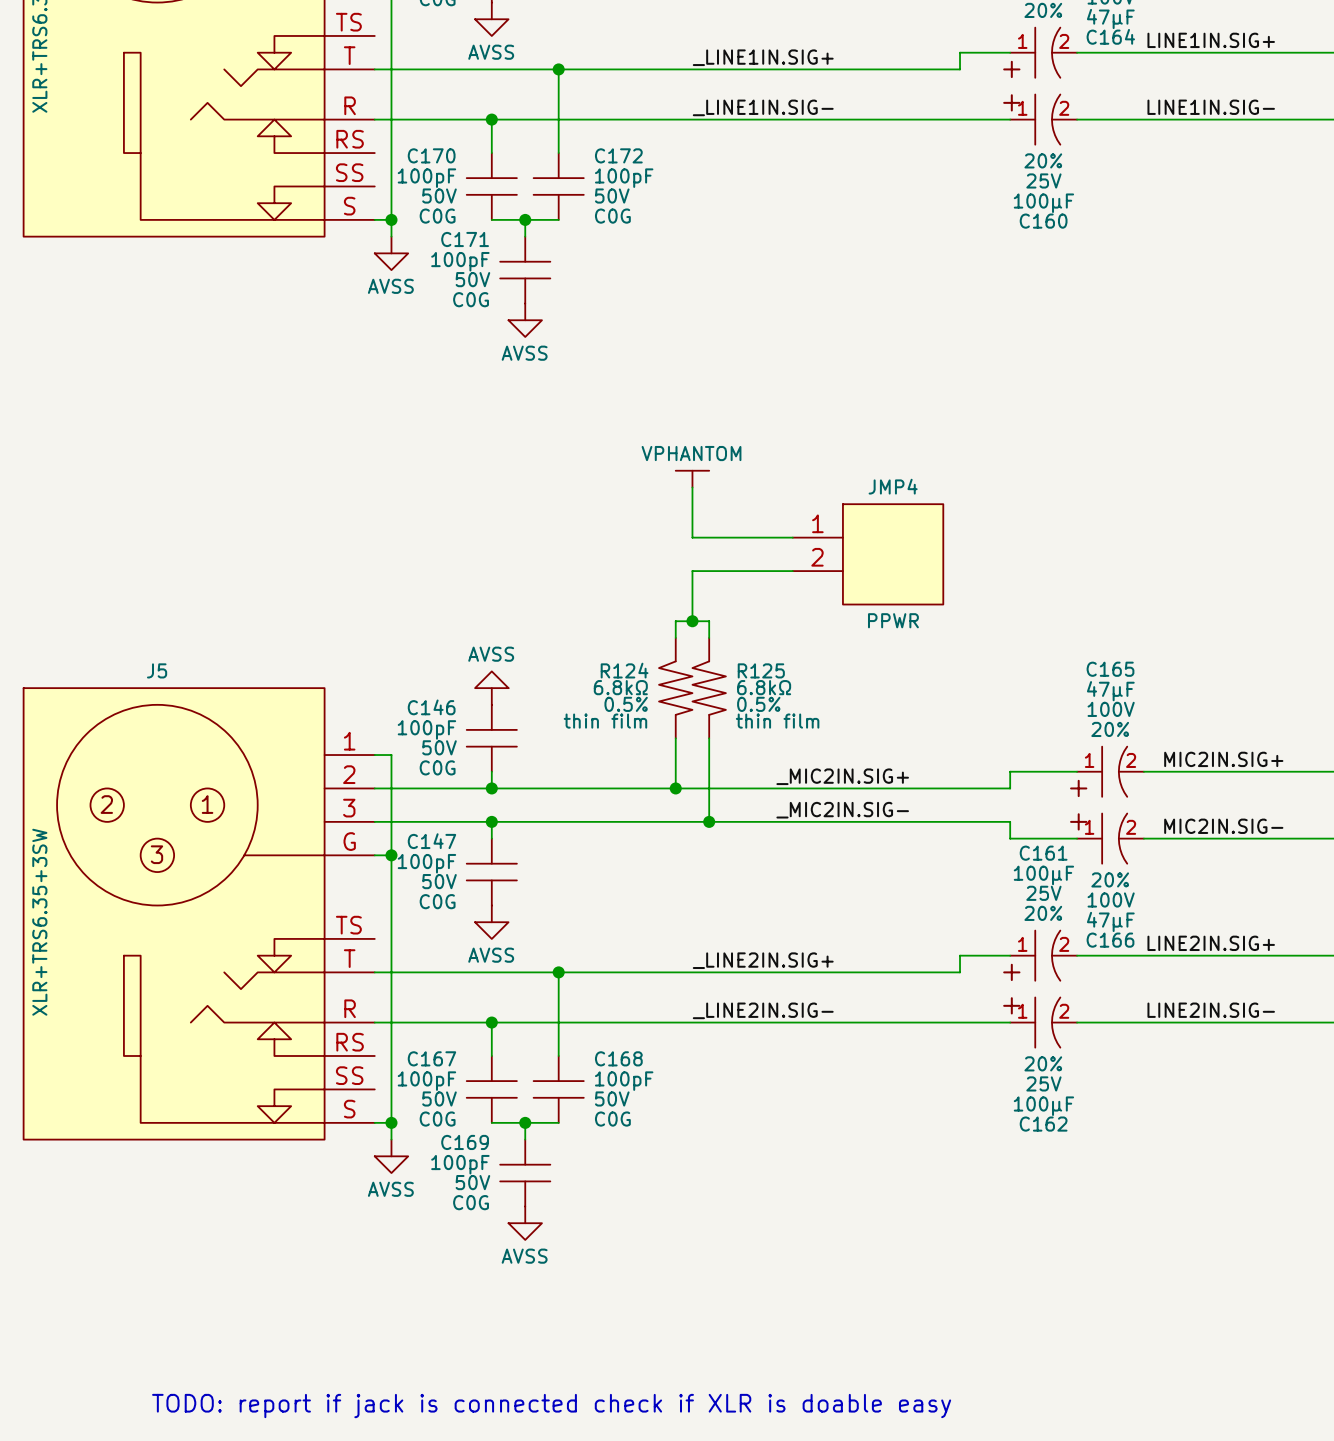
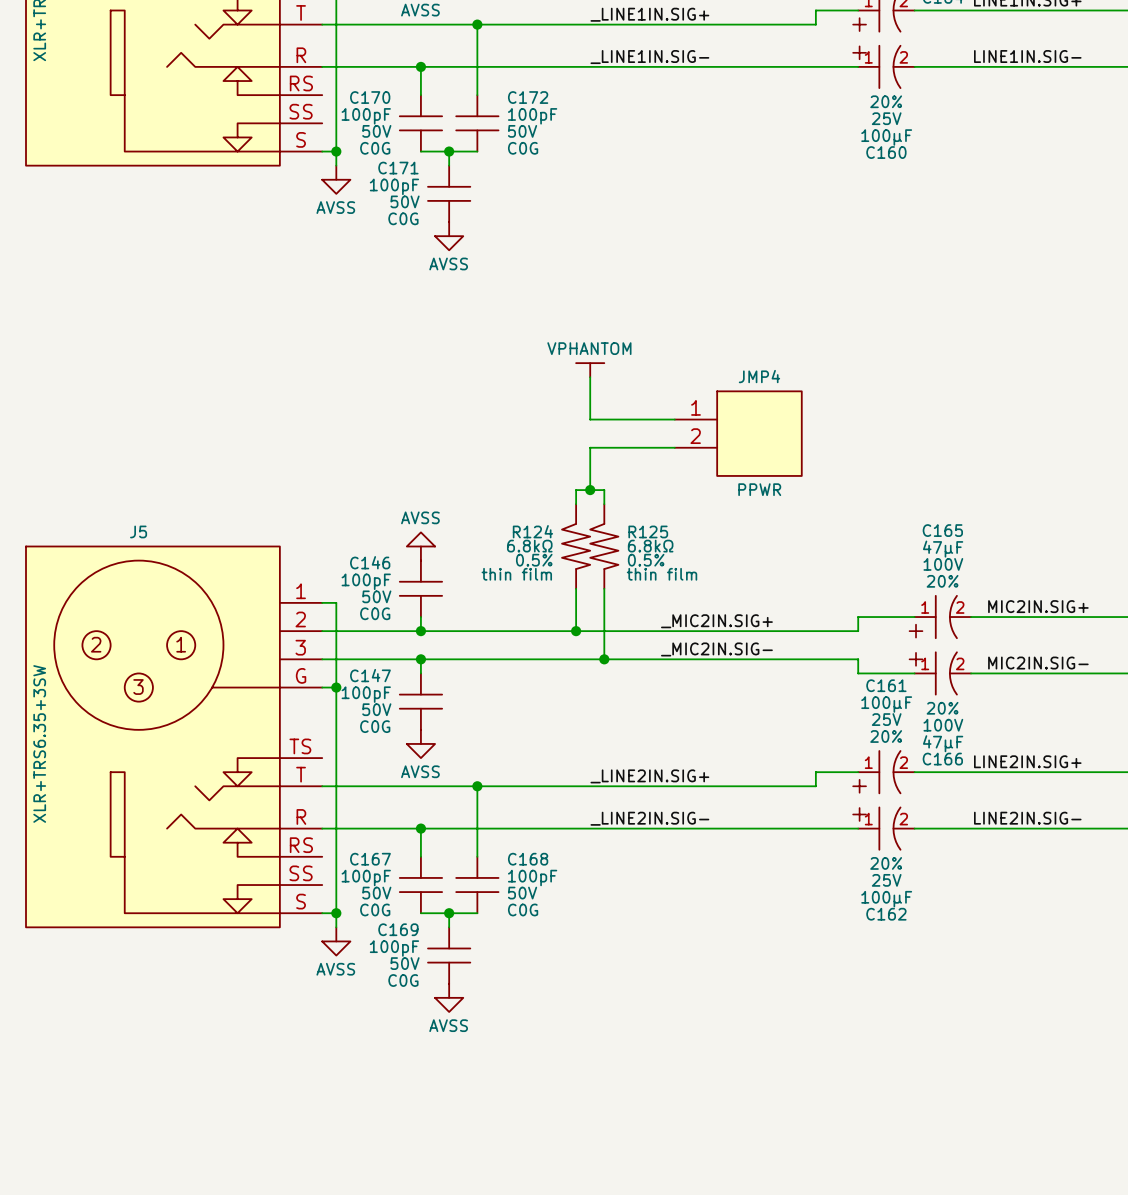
text: TODO: report if jack is connected check if XLR is doable easy (551, 1406) -> none

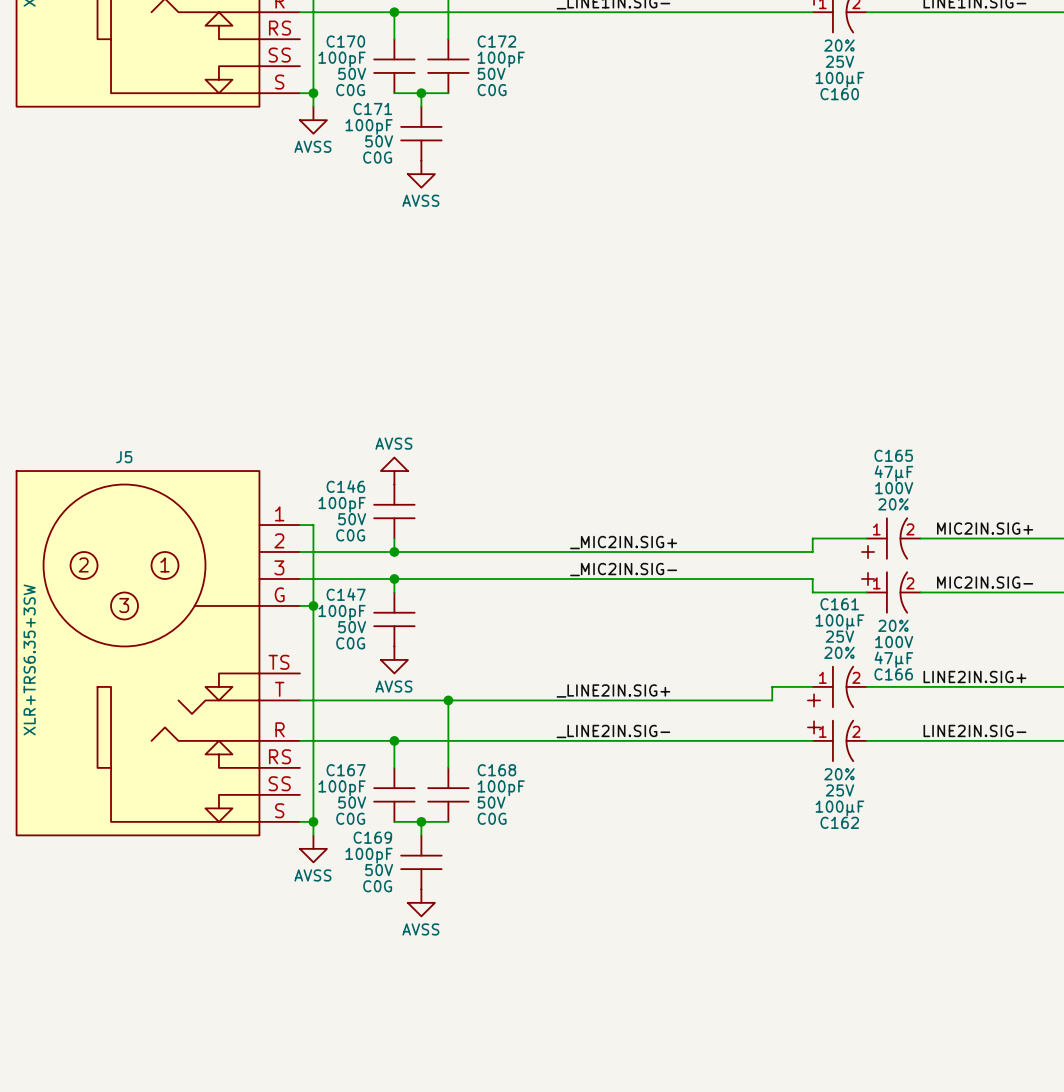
power symbol: VPHANTOM (590, 370) -> none
wire: (590, 377) (590, 419) (674, 419) -> none
JMP4: PPWR (738, 433) -> none
wire: (674, 447) (590, 447) (590, 490) -> none
junction: (590, 490) -> none
wire: (576, 504) (576, 490) (604, 490) (604, 504) -> none
R124: (576, 546) -> none
R125: (604, 546) -> none
wire: (576, 588) (576, 631) -> none
wire: (604, 588) (604, 659) -> none
label position: _MIC2IN.SIG+ (716, 621) -> _MIC2IN.SIG+ (623, 542)
junction: (576, 631) -> none
label position: _MIC2IN.SIG- (716, 649) -> _MIC2IN.SIG- (623, 569)
junction: (604, 659) -> none

